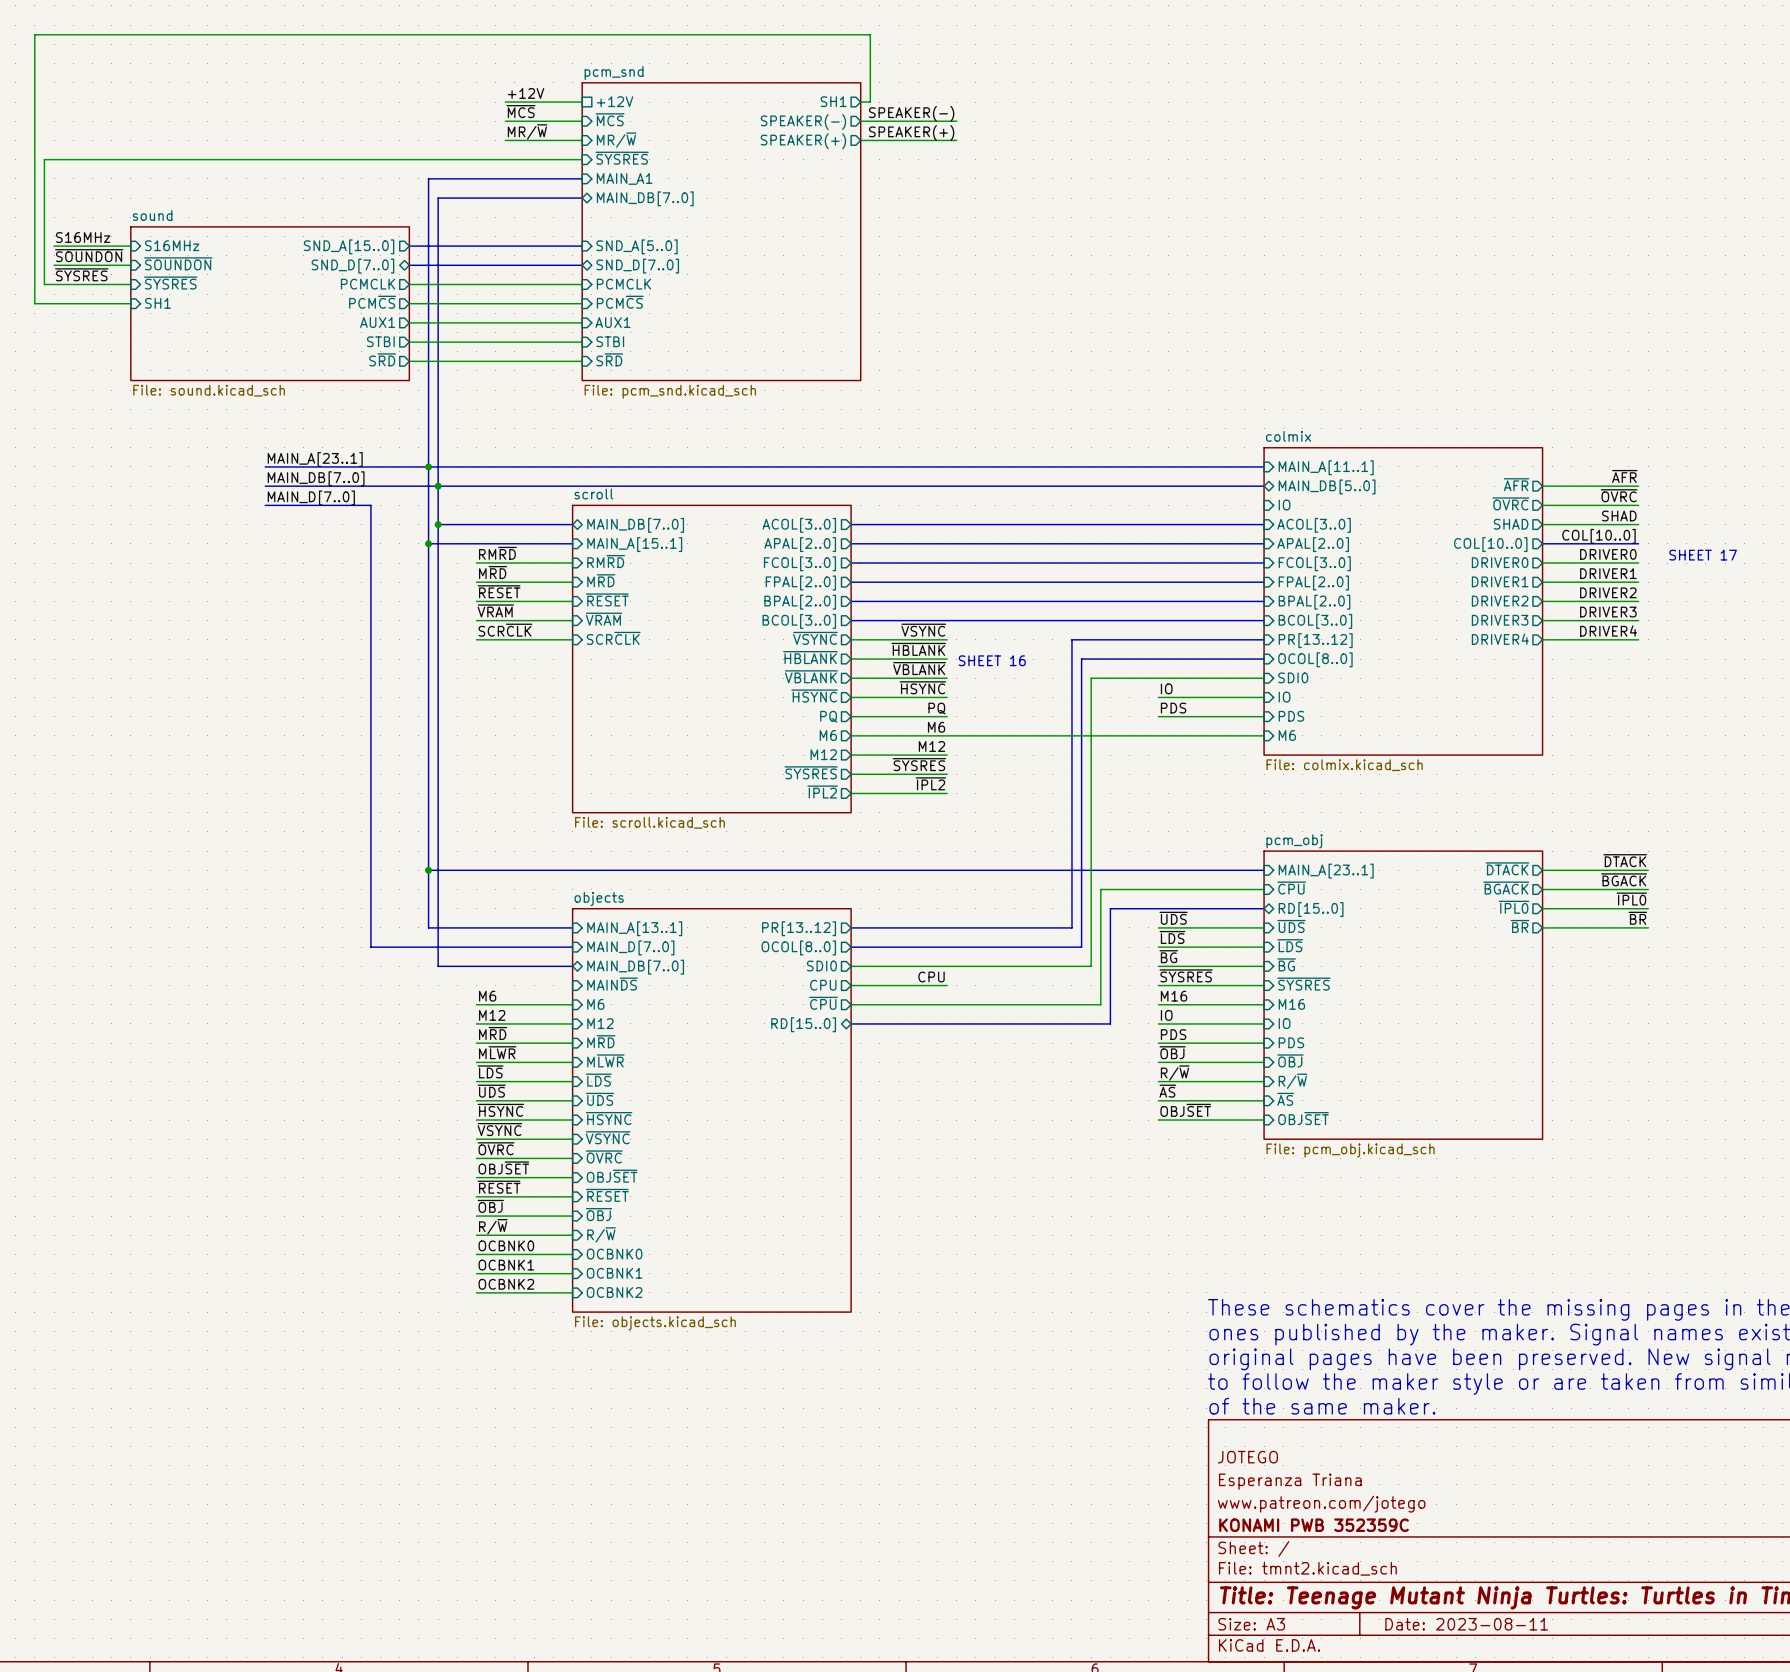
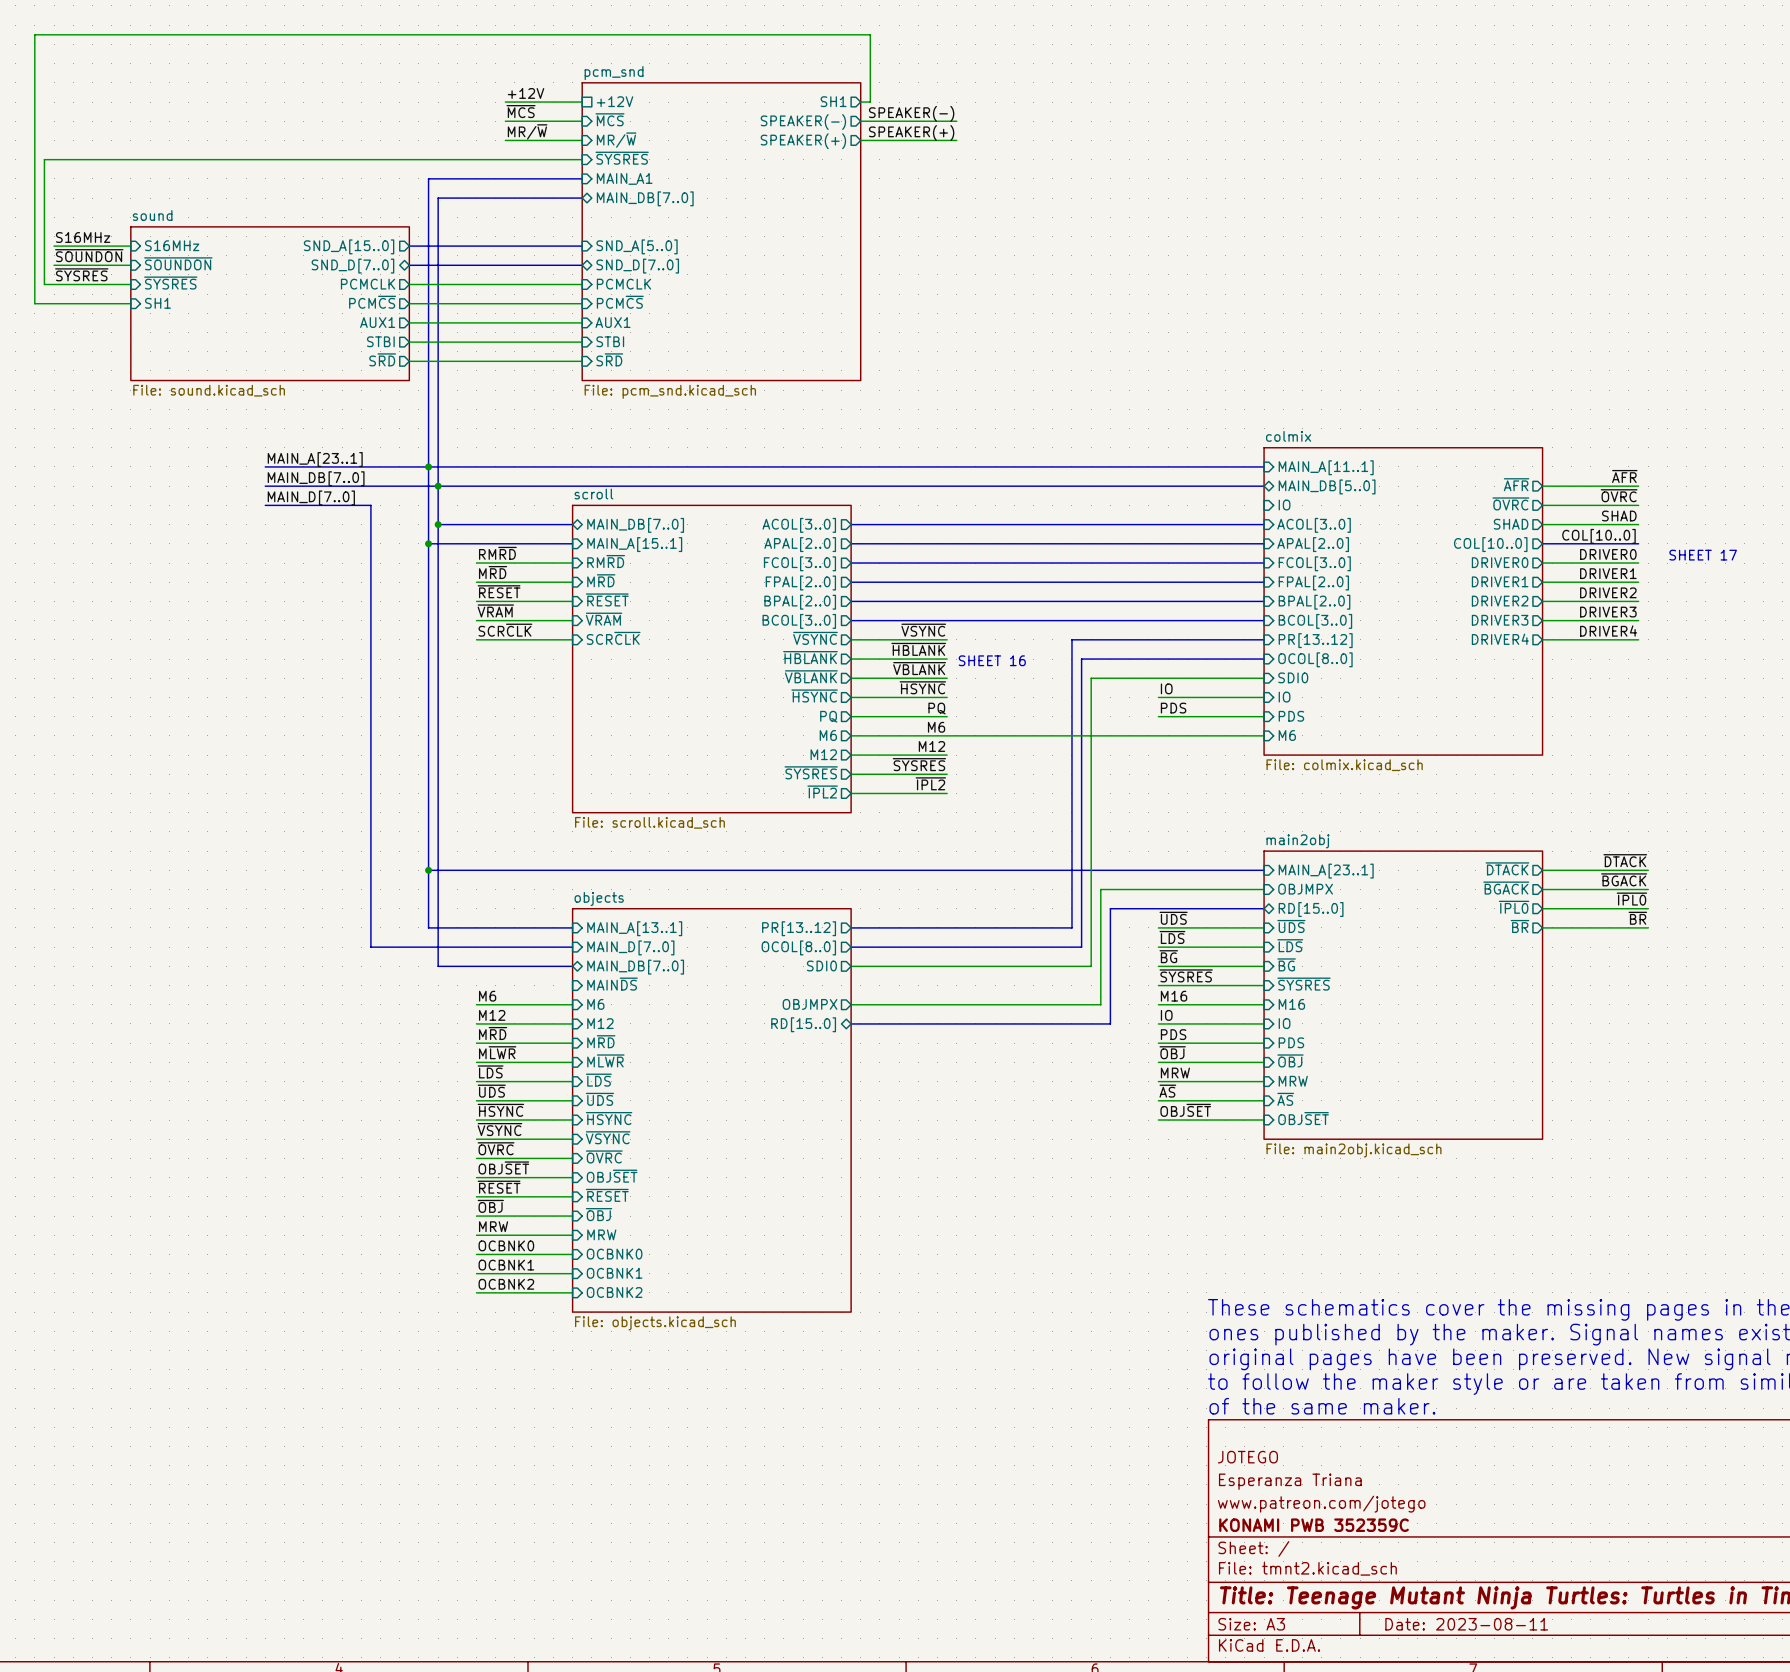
sheet pcm_obj name: pcm_obj (1294, 841) -> main2obj (1297, 841)
sheet pin: ~{CPU} (1291, 888) -> OBJMPX (1305, 889)
label: CPU (931, 976) -> none
sheet pin: CPU (823, 985) -> none
wire: (851, 985) (947, 985) -> none
sheet pin: ~{CPU} (823, 1003) -> OBJMPX (810, 1004)
label: R/~{W} (1175, 1073) -> MRW (1175, 1073)
sheet pin: R/~{W} (1293, 1081) -> MRW (1293, 1081)
sheet pcm_obj value: File: pcm_obj.kicad_sch (1350, 1150) -> File: main2obj.kicad_sch (1353, 1150)
label: R/~{W} (493, 1226) -> MRW (493, 1226)
sheet pin: R/~{W} (601, 1234) -> MRW (601, 1234)

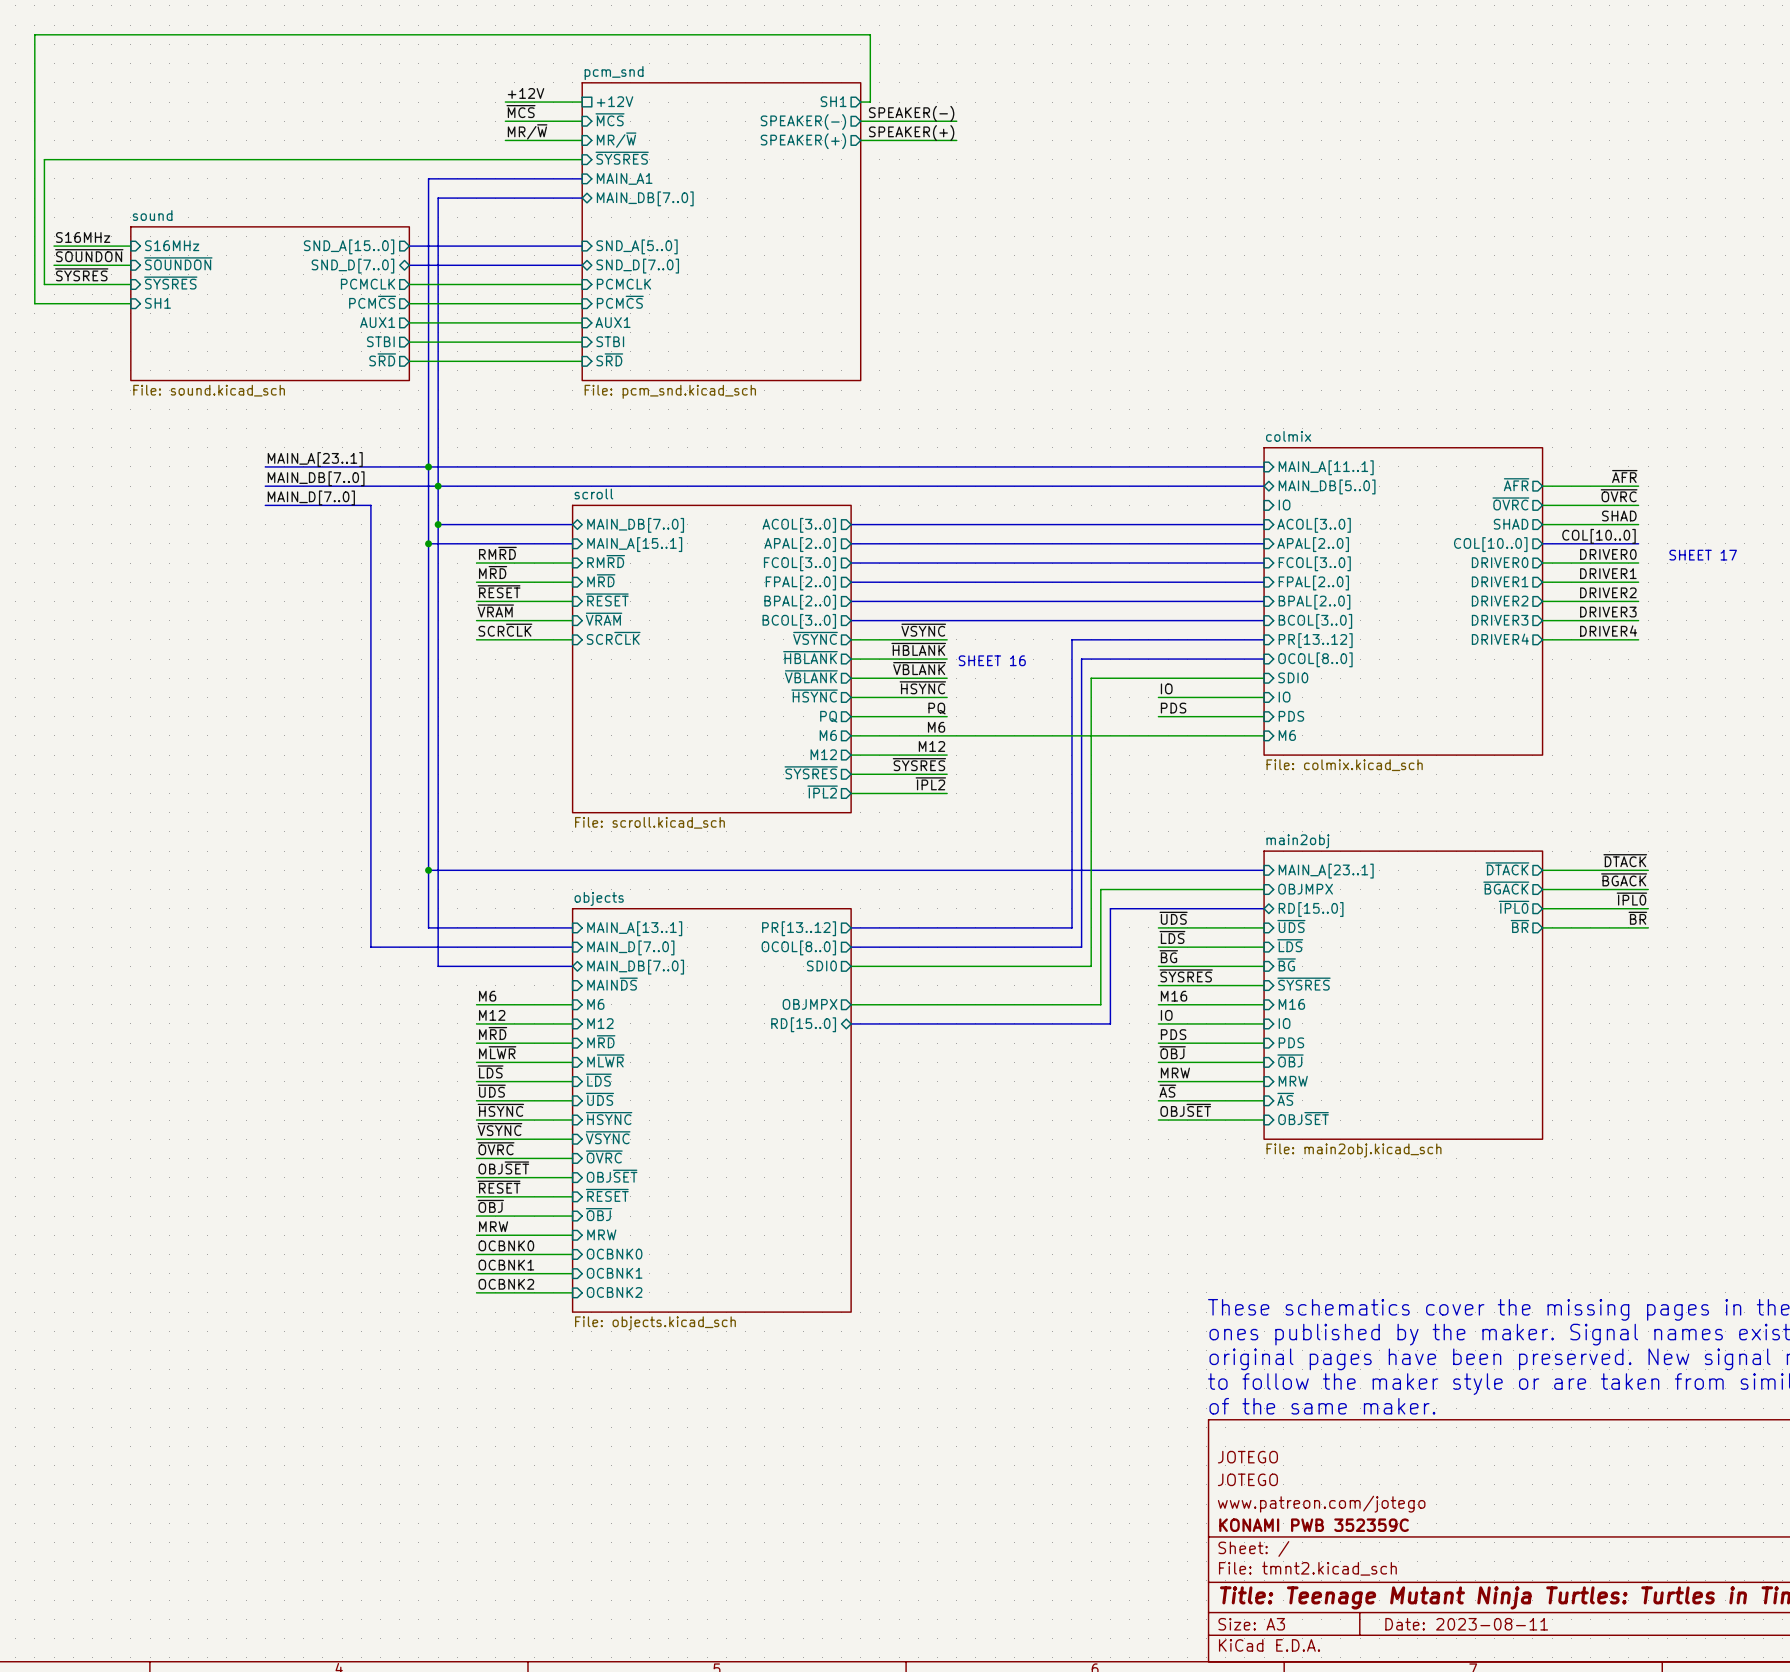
title block: Esperanza Triana (1290, 1481) -> JOTEGO (1247, 1479)

